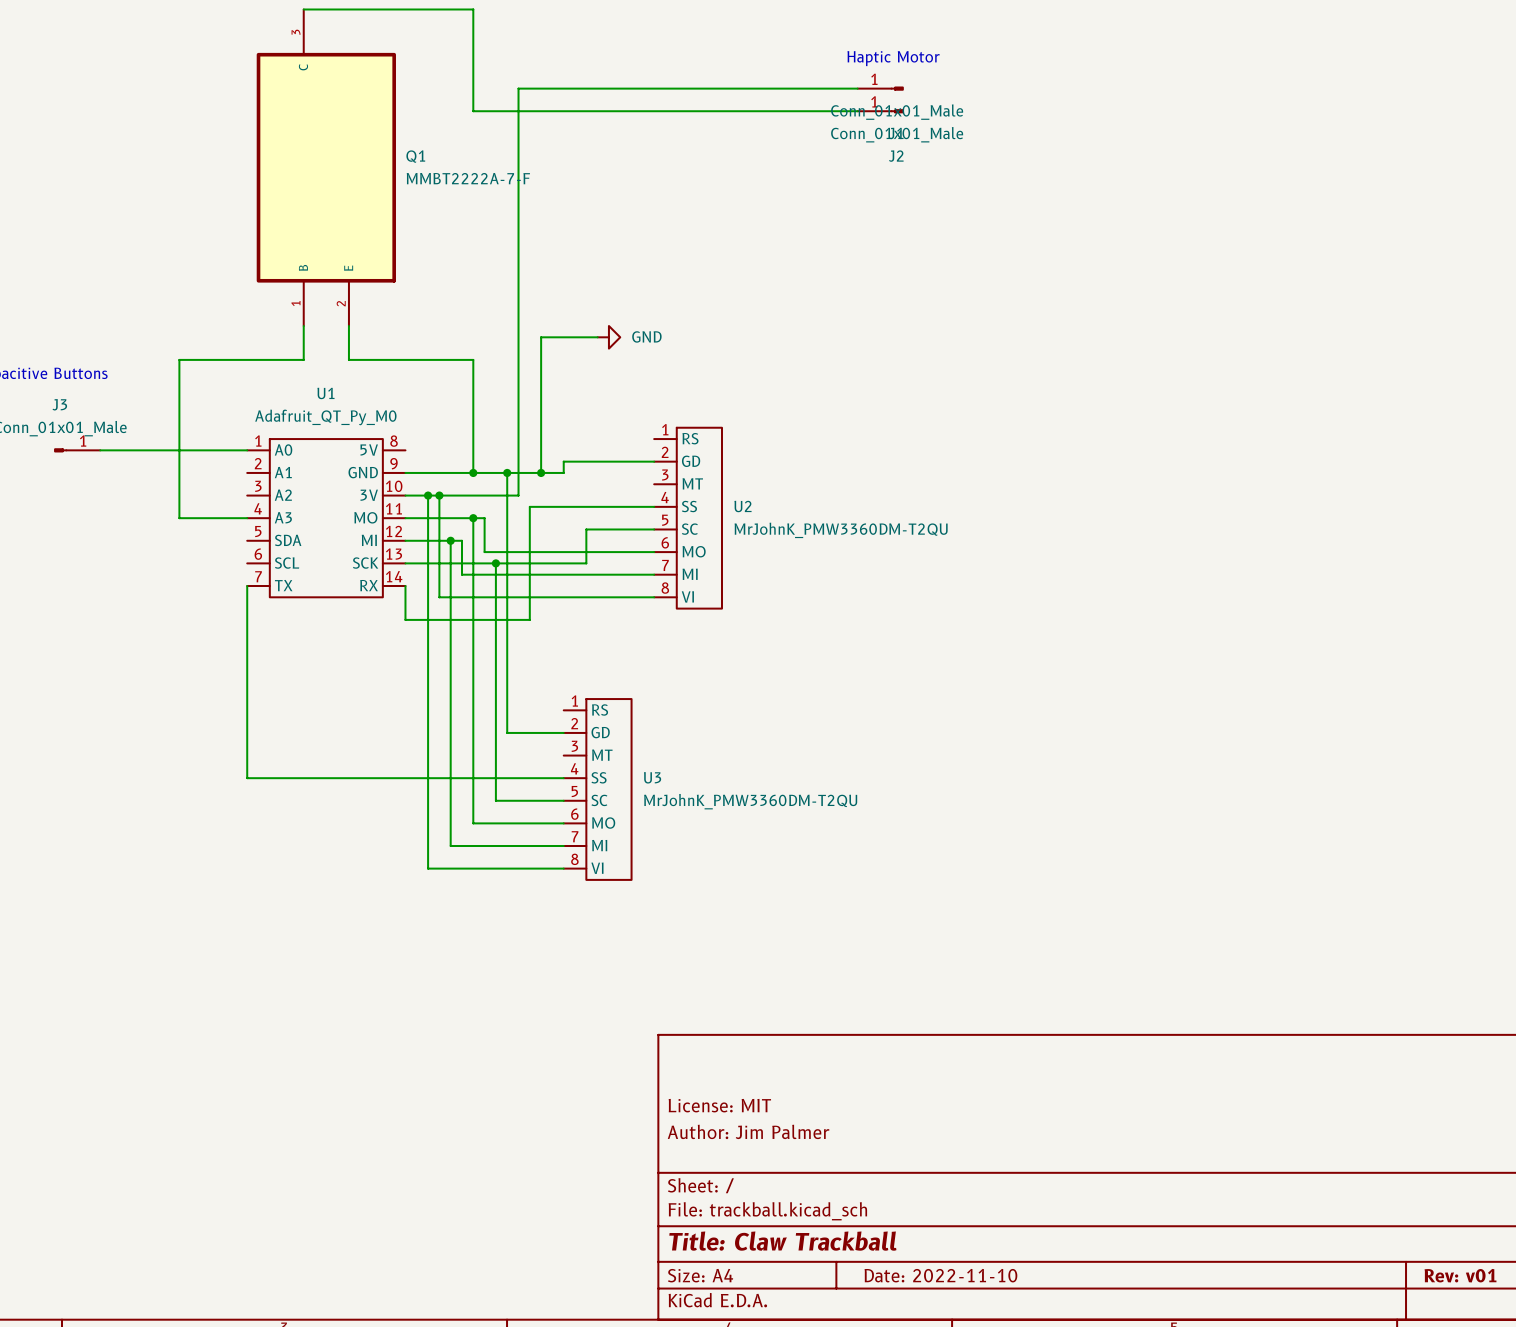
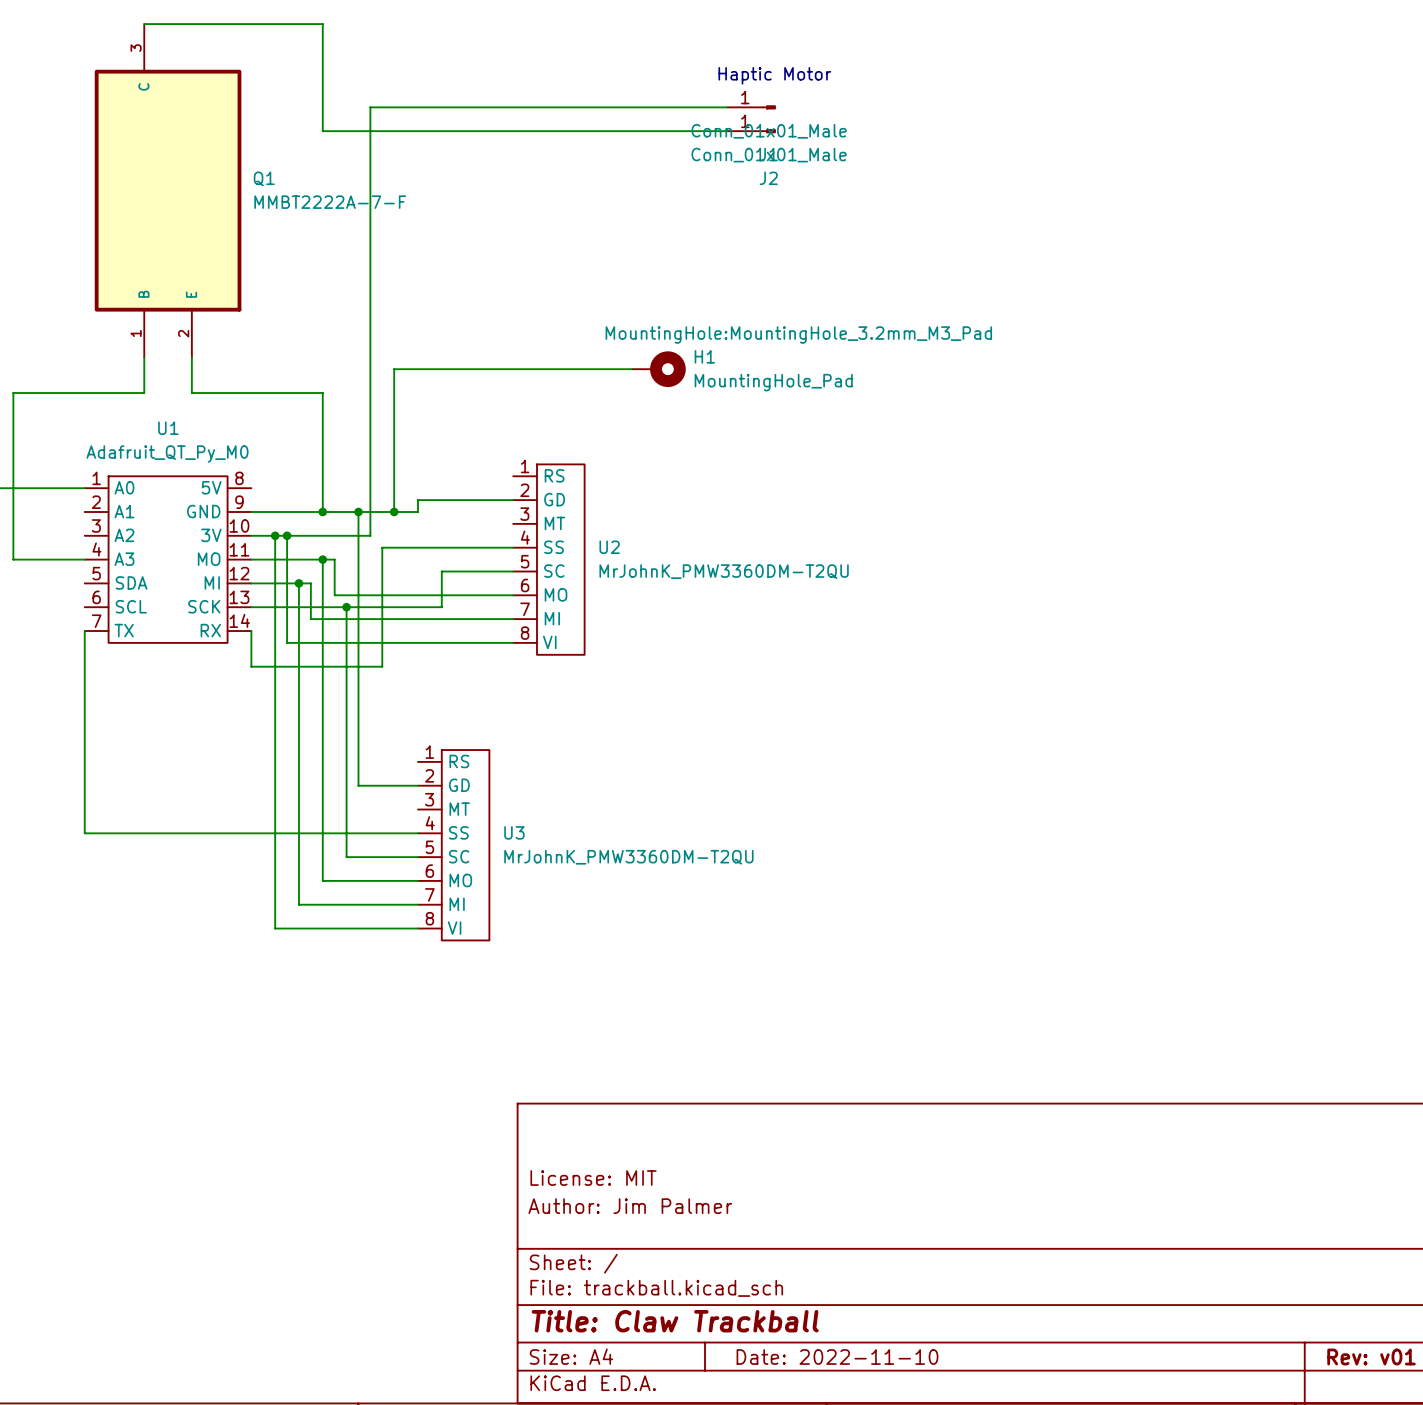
wire: none -> (453, 369) (632, 369)
power symbol: GND (608, 337) -> none
H1: none -> MountingHole_Pad (658, 369)

